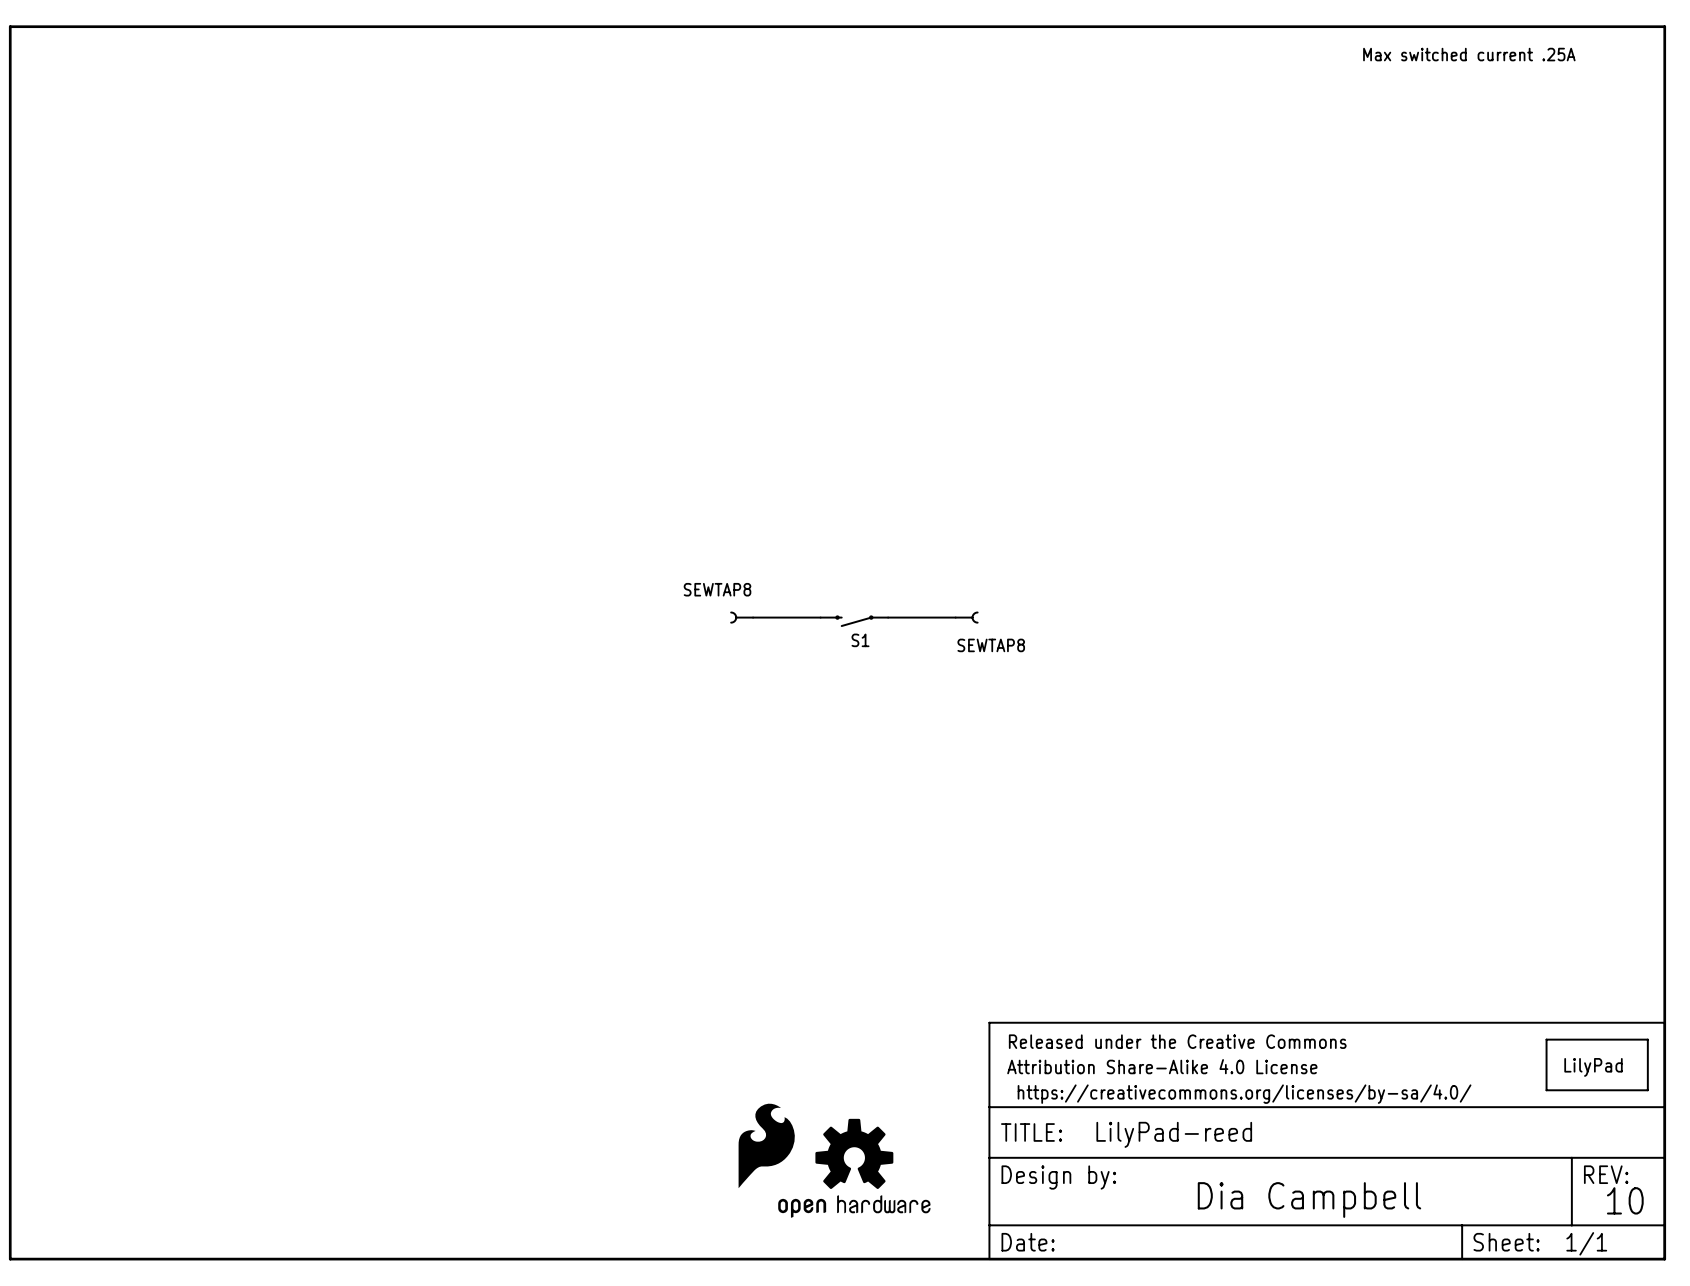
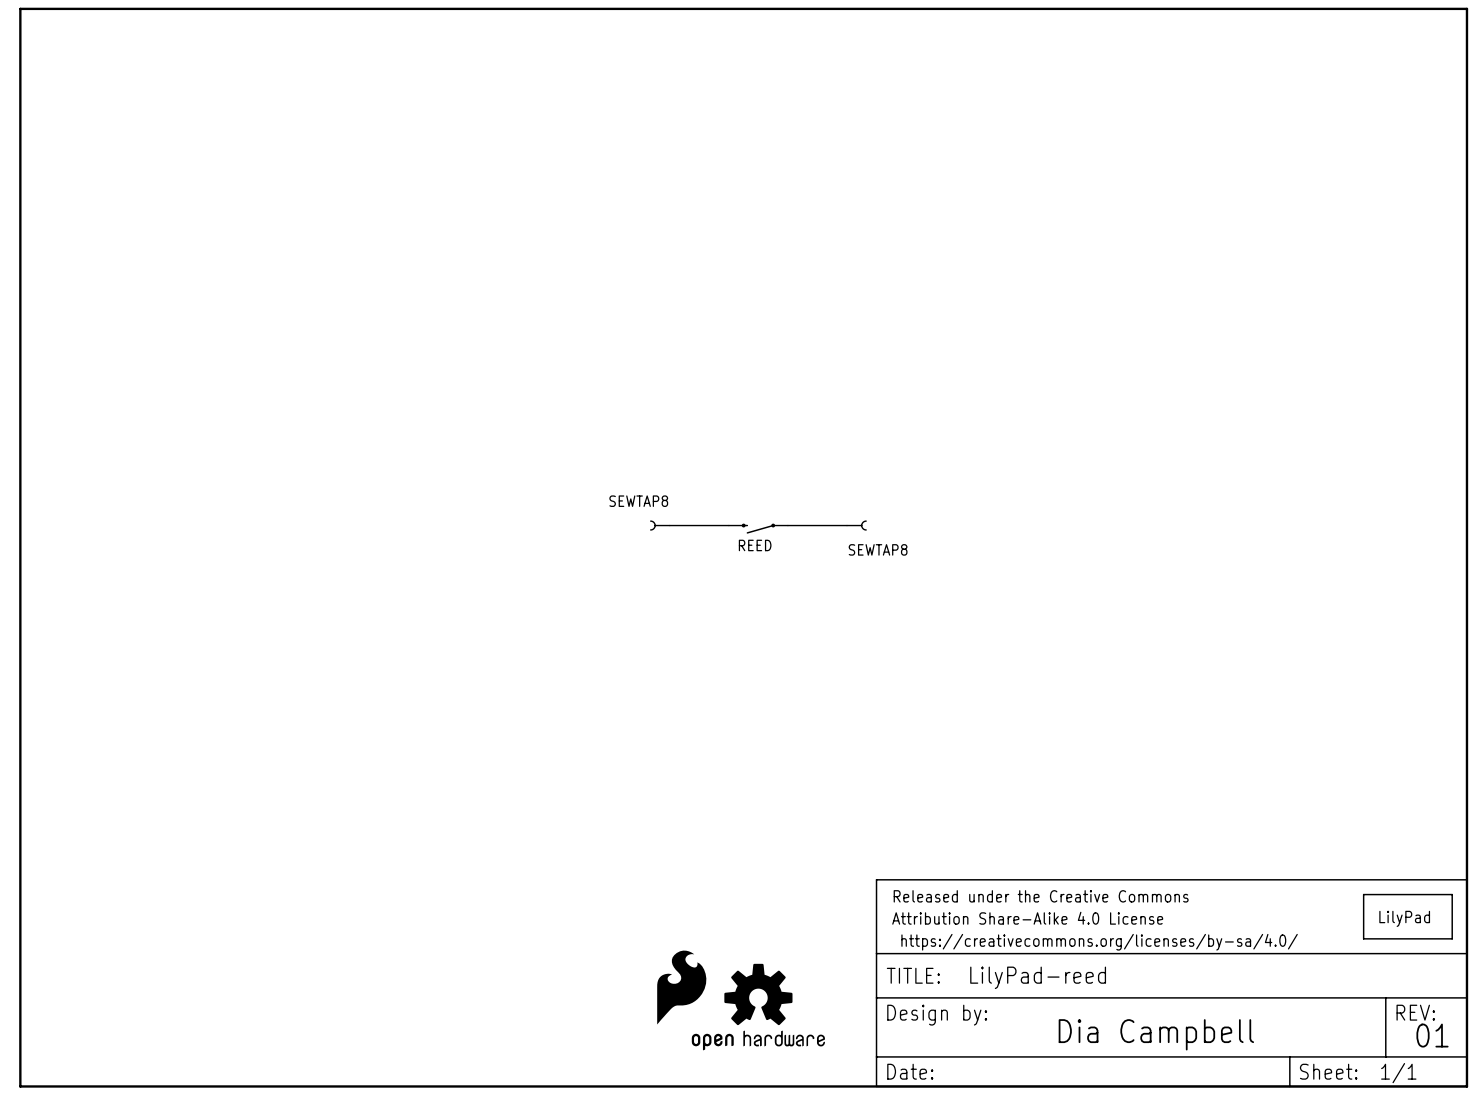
text: Max switched current .25A (1469, 54) -> none
S1 name: S1 (860, 640) -> REED (755, 545)
text: 10 (1625, 1200) -> 01 (1432, 1035)

